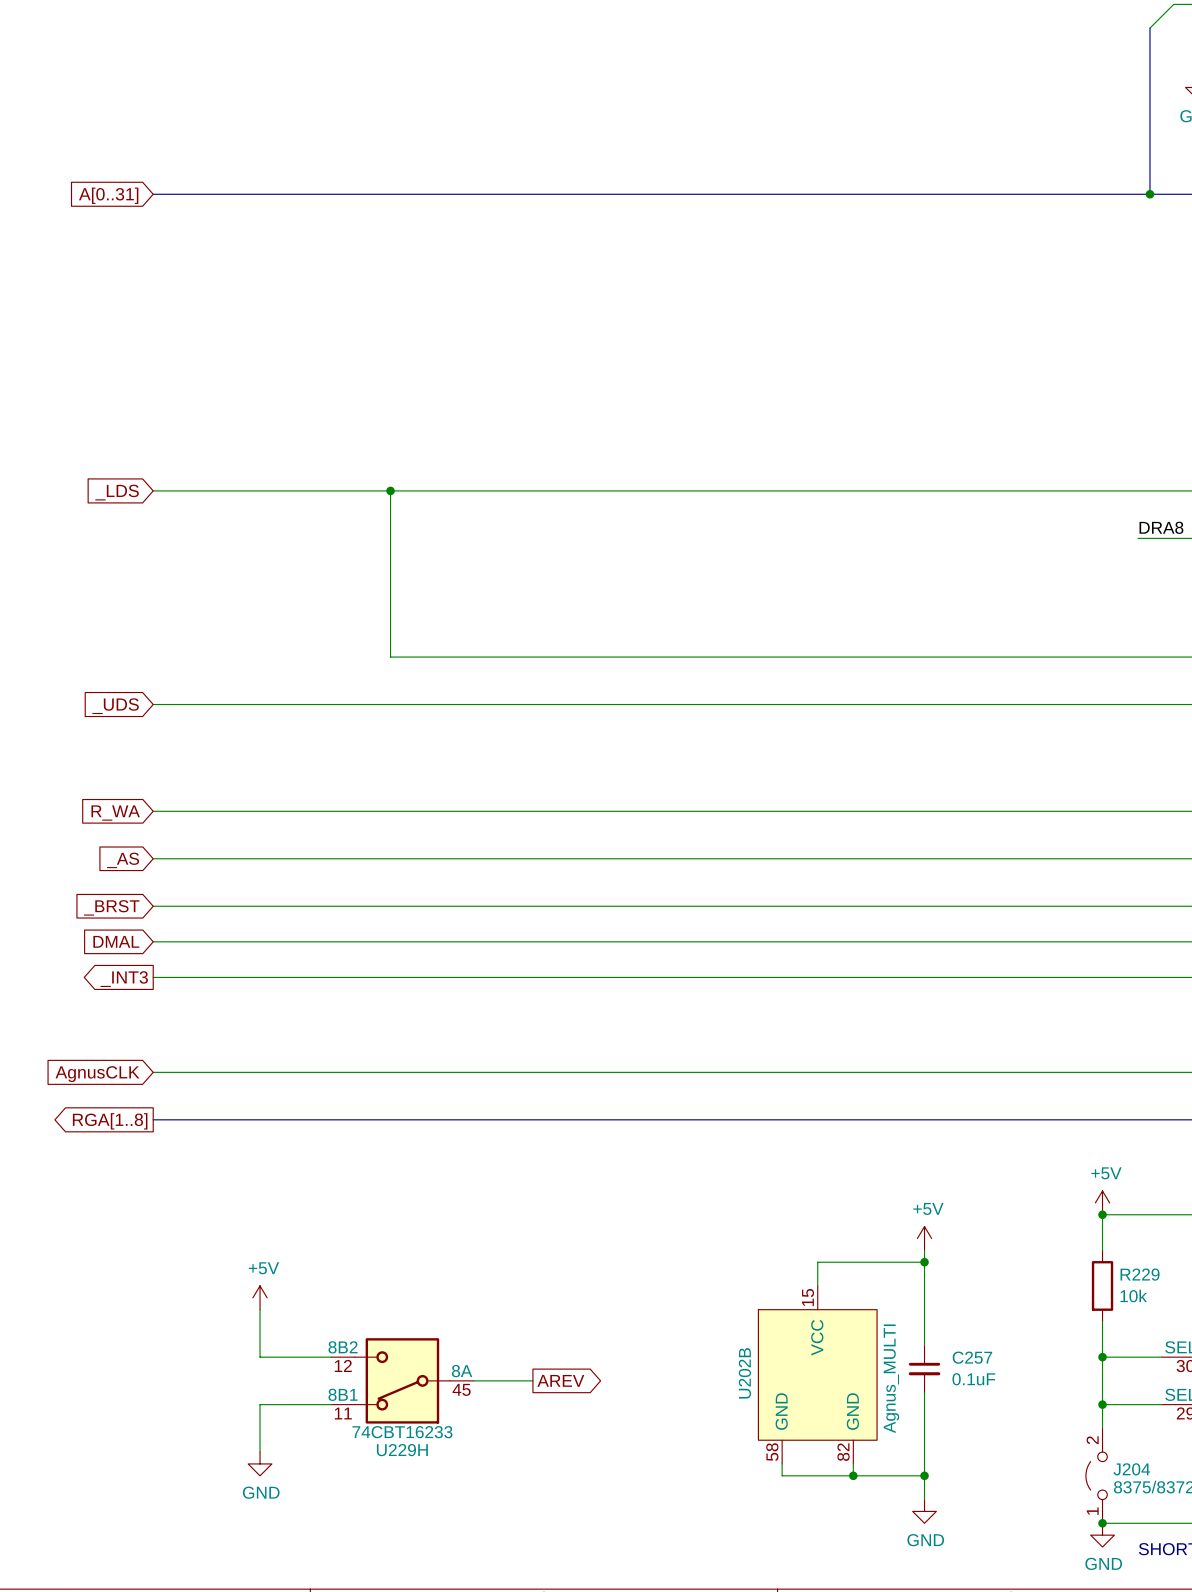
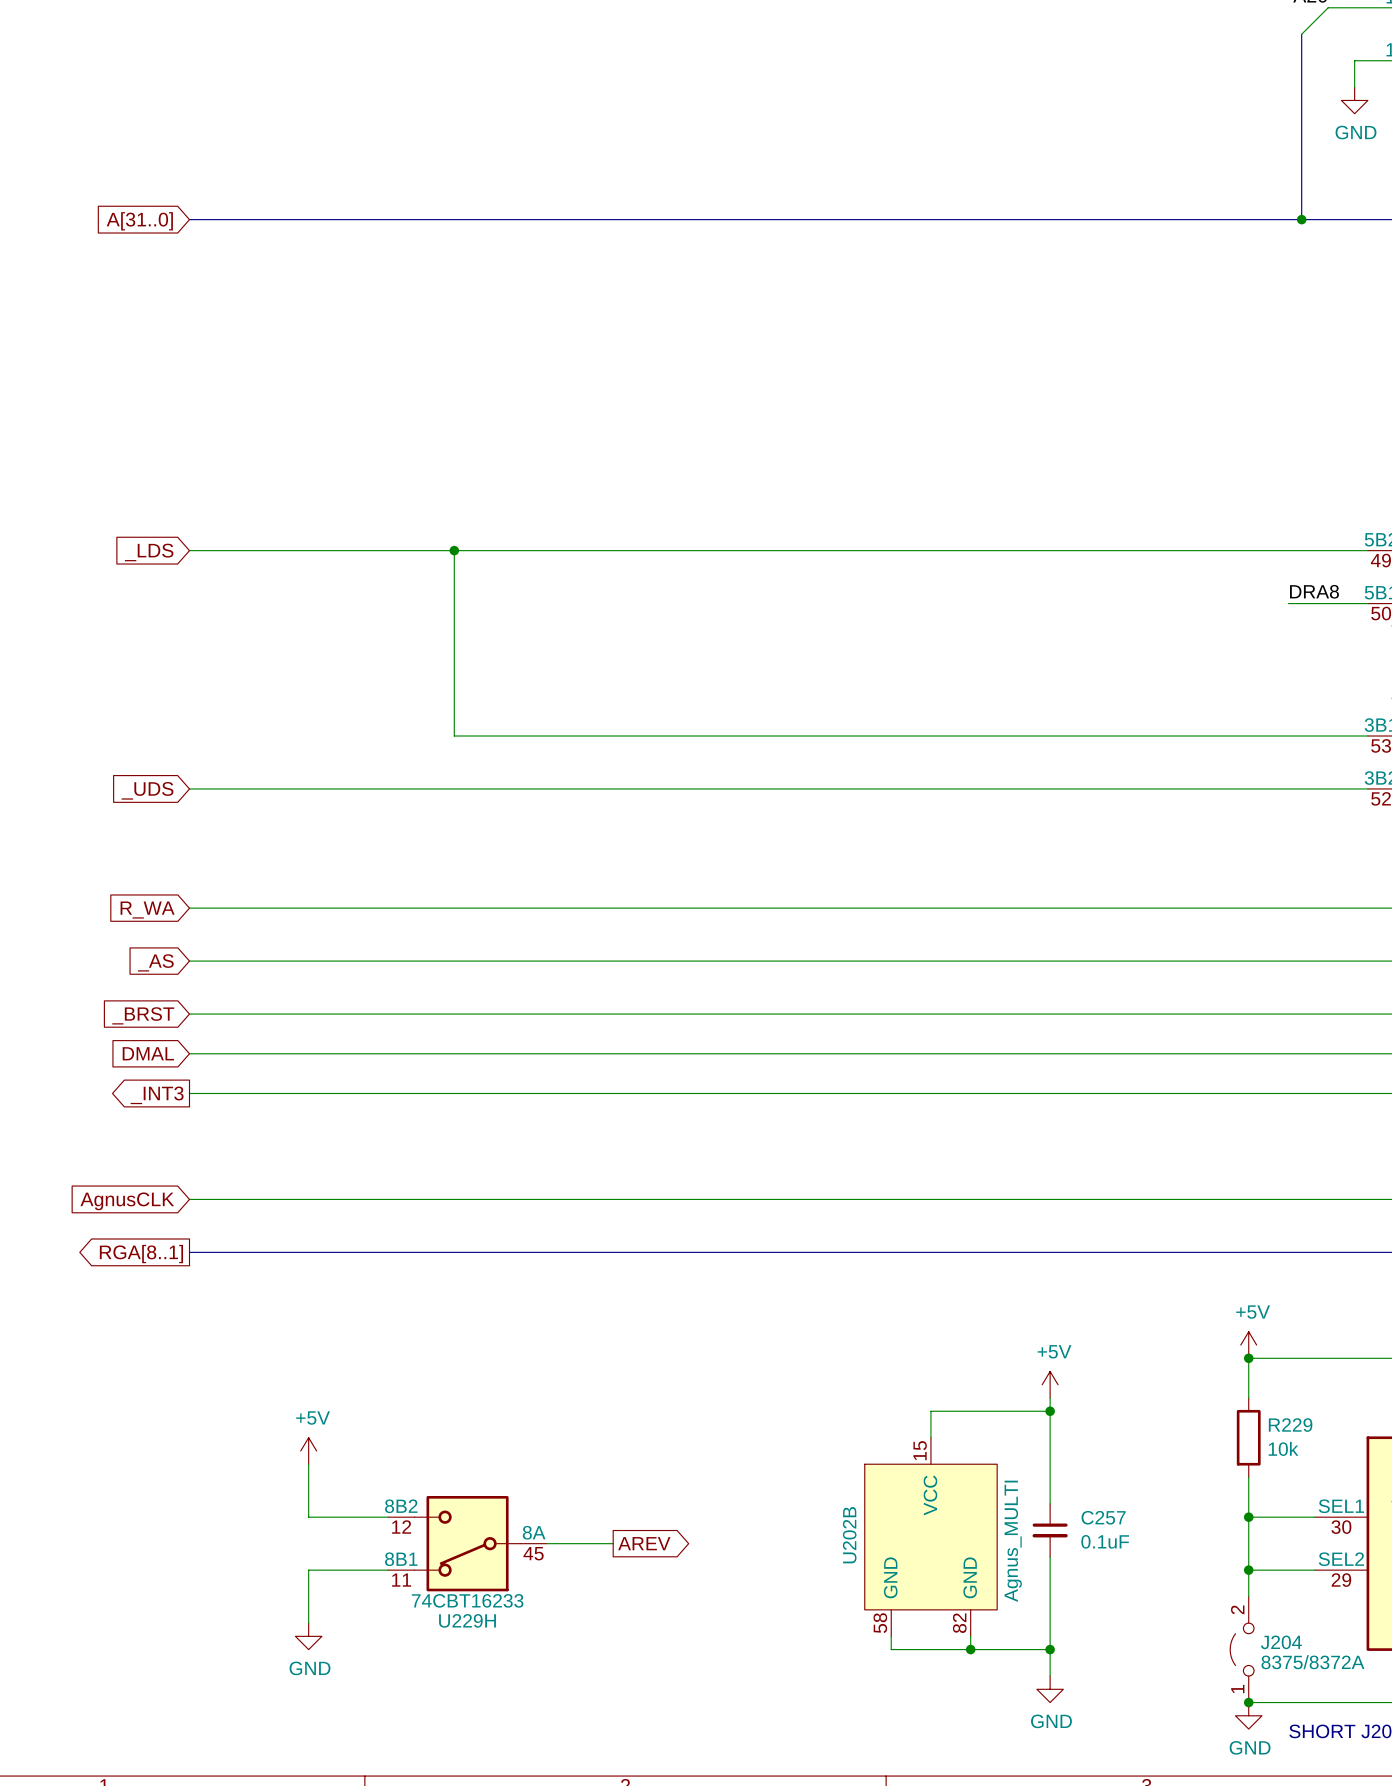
global label: A[0..31] (108, 195) -> A[31..0] (139, 221)
global label: RGA[1..8] (110, 1121) -> RGA[8..1] (141, 1254)

